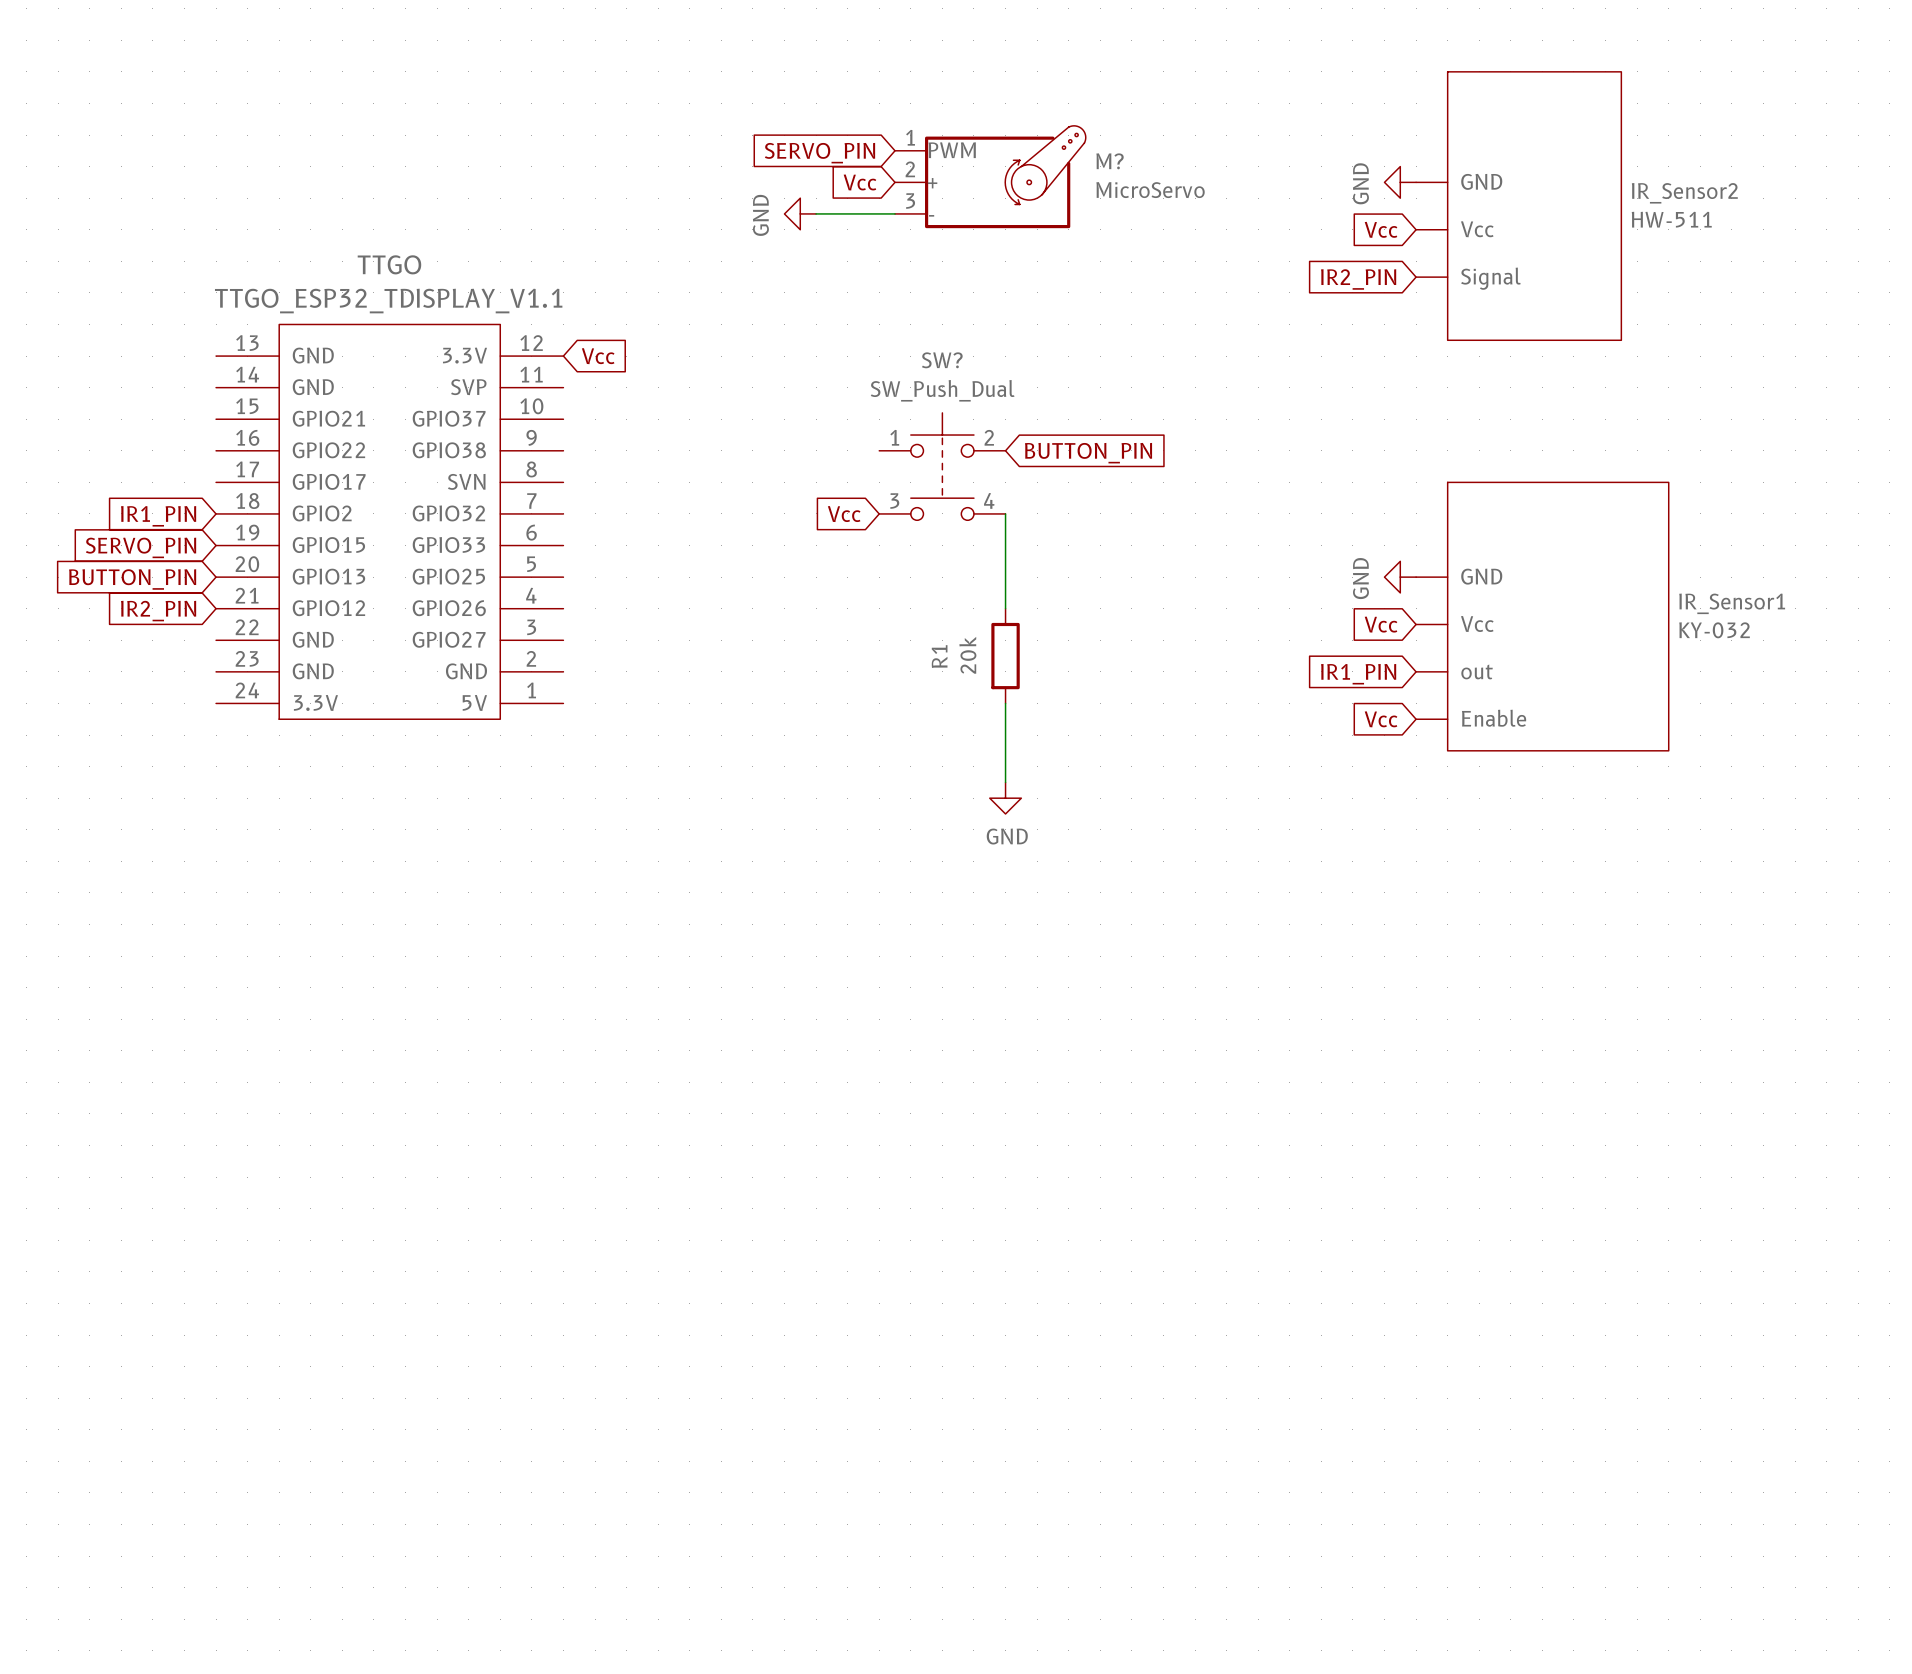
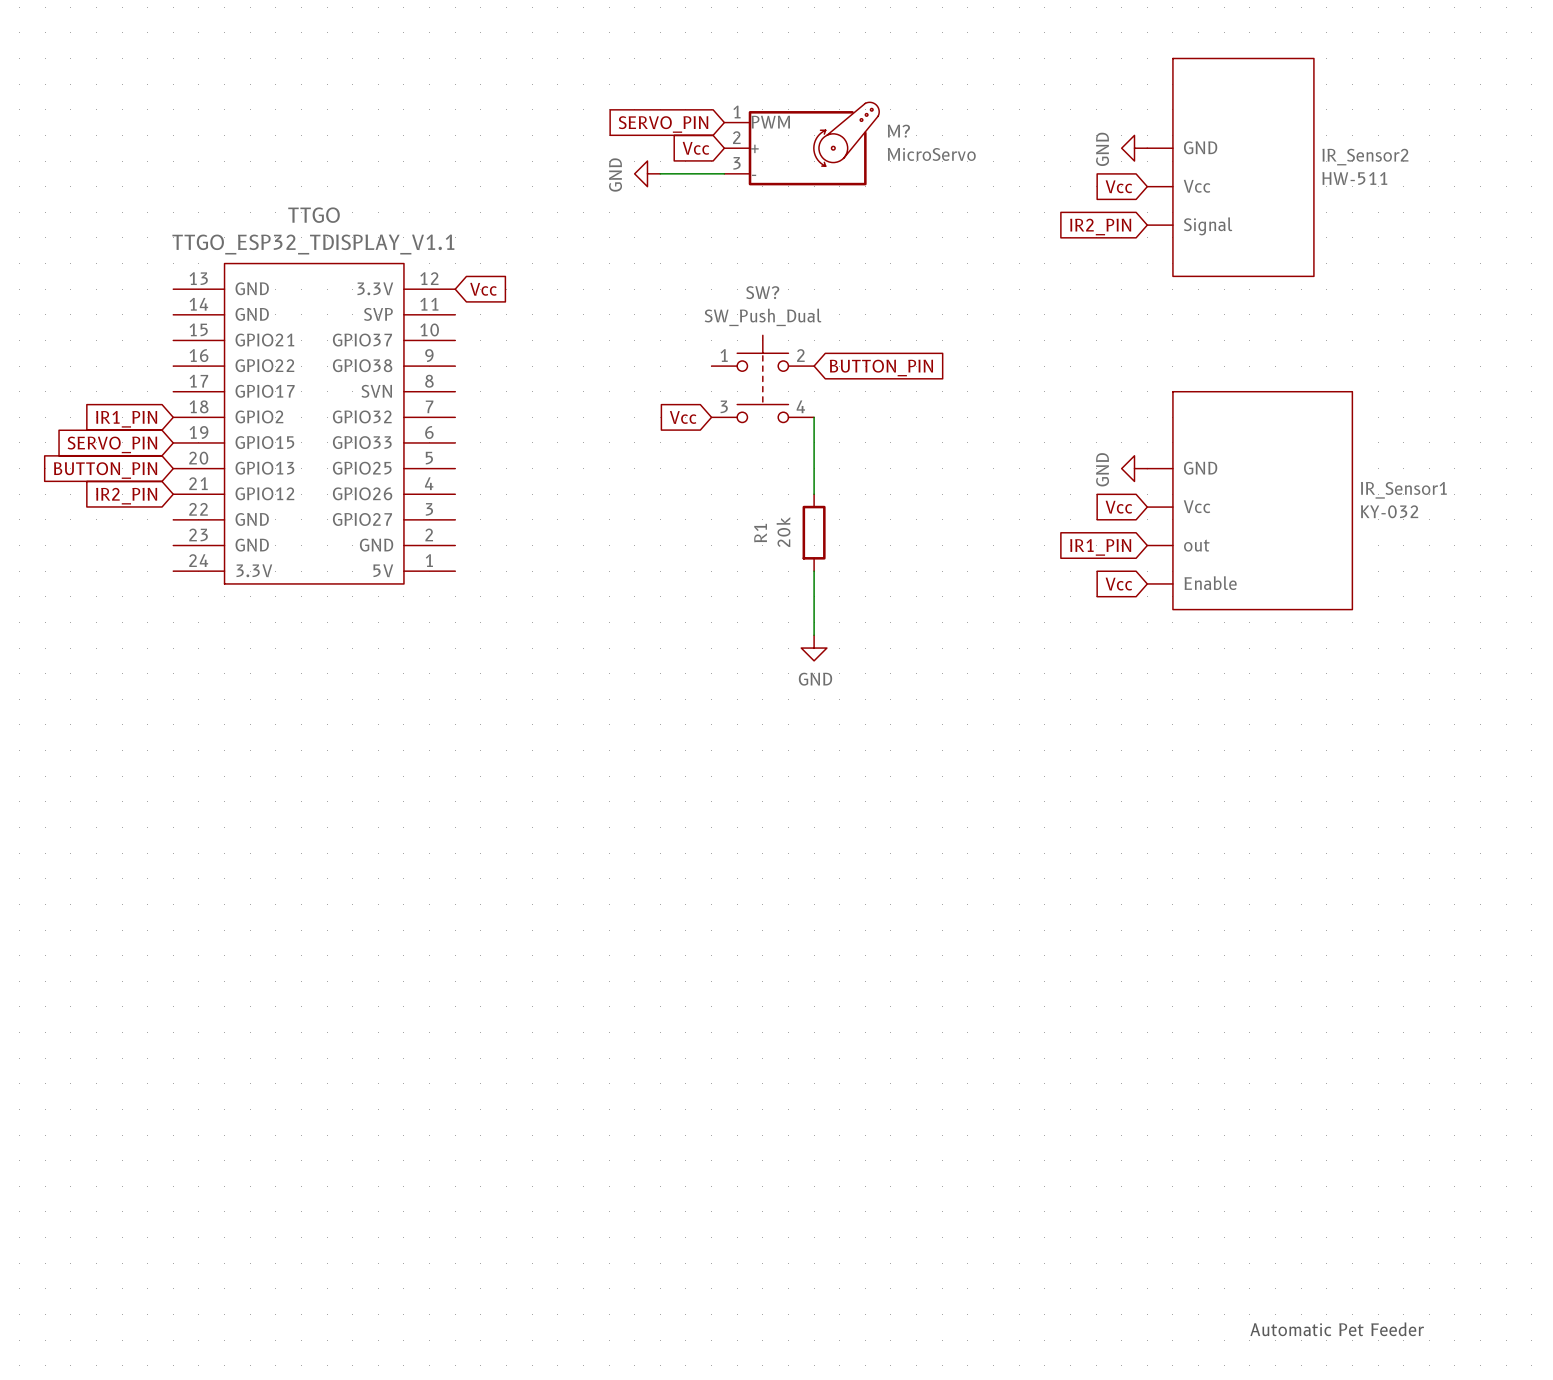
text: none -> Automatic Pet Feeder (1337, 1329)

